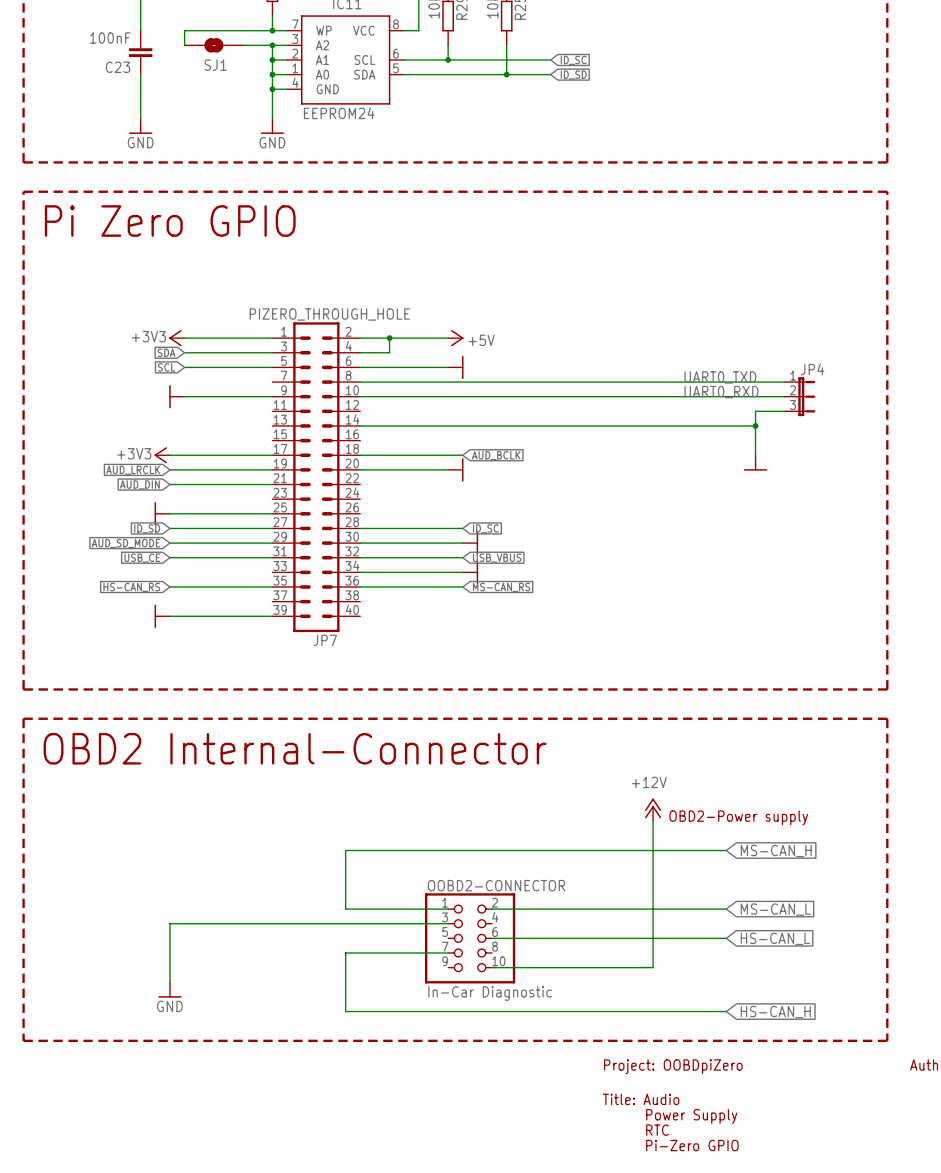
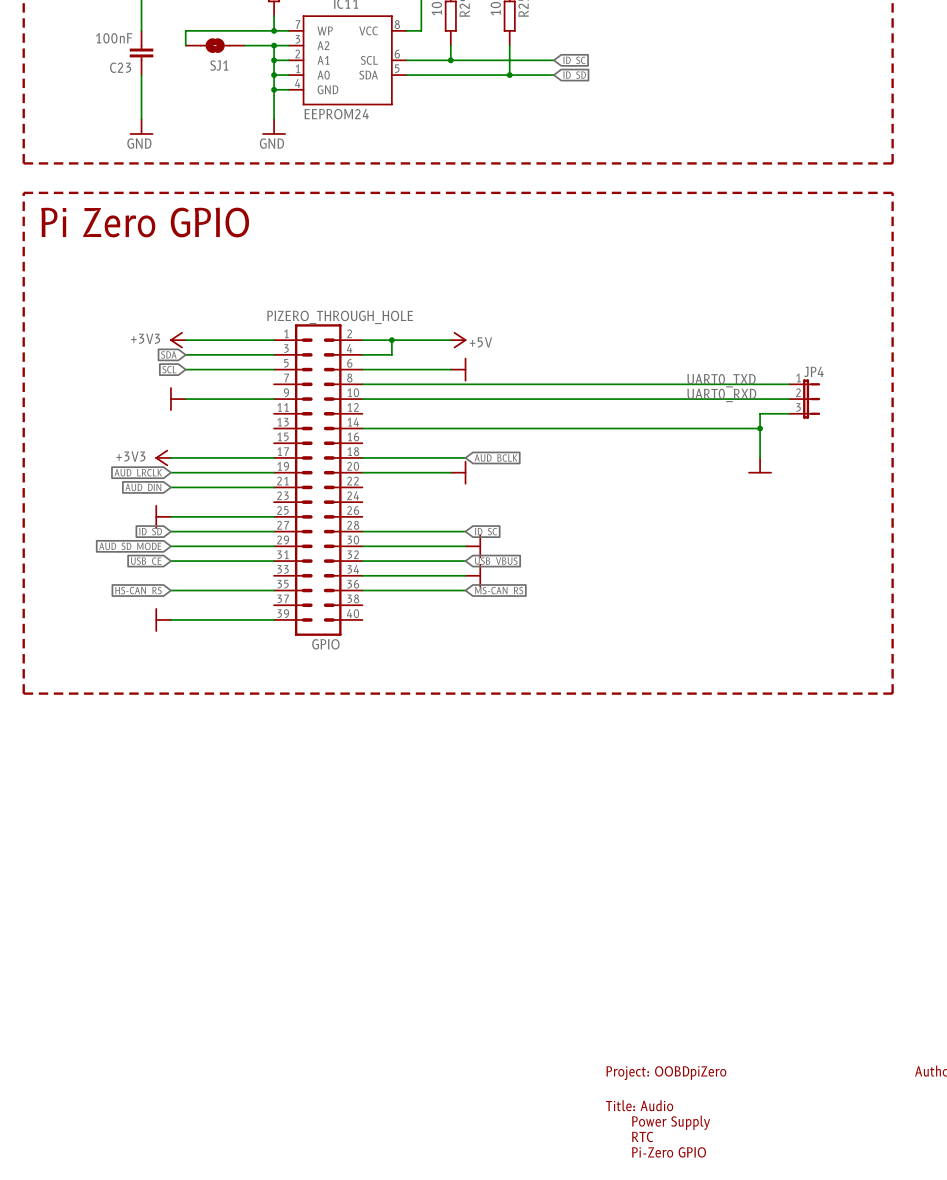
JP7 name: JP7 (325, 640) -> GPIO (325, 644)
line: (23, 718) (23, 1040) (887, 1040) (887, 718) (23, 718) -> none
text: OBD2 Internal-Connector (295, 748) -> none
power symbol: +12V (653, 809) -> none
text: OBD2-Power supply (738, 817) -> none
wire: (653, 821) (653, 967) (492, 967) -> none
wire: (726, 850) (345, 850) (345, 909) (448, 909) -> none
global label: MS-CAN_H (776, 851) -> none
wire: (492, 909) (726, 909) -> none
global label: MS-CAN_L (775, 909) -> none
wire: (448, 923) (169, 923) (169, 982) -> none
OOBD2-CONNECTOR: In-Car Diagnostic (470, 938) -> none
wire: (492, 938) (726, 938) -> none
global label: HS-CAN_L (775, 938) -> none
wire: (448, 953) (345, 953) (345, 1011) (726, 1011) -> none
power symbol: GND (169, 989) -> none
global label: HS-CAN_H (775, 1012) -> none

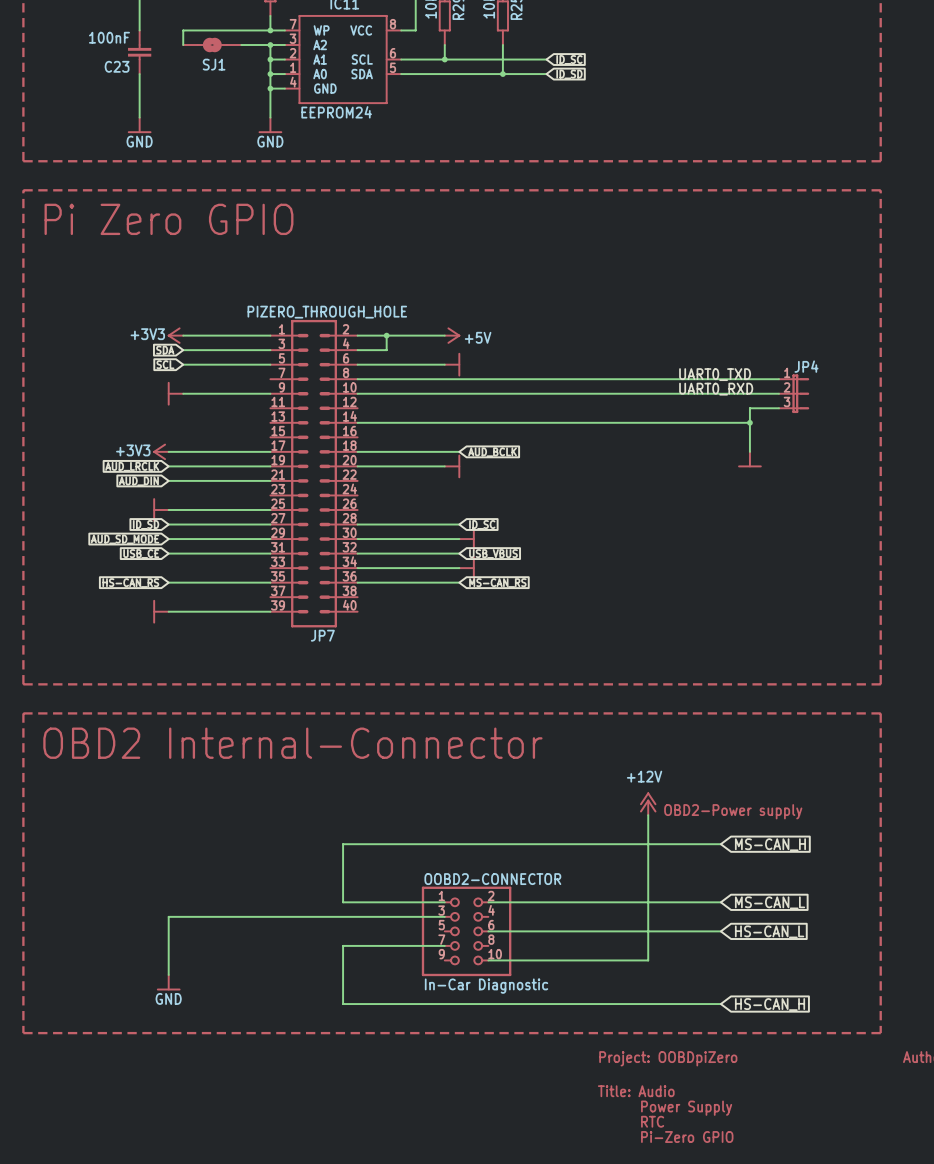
GPIO name: GPIO (325, 644) -> JP7 (322, 635)
line: none -> (23, 713) (23, 1033) (880, 1033) (880, 713) (23, 713)
text: none -> OBD2 Internal-Connector (292, 743)
power symbol: none -> +12V (648, 803)
text: none -> OBD2-Power supply (733, 811)
wire: none -> (648, 815) (648, 960) (488, 960)
wire: none -> (720, 844) (343, 844) (343, 902) (444, 902)
global label: none -> MS-CAN_H (770, 844)
wire: none -> (488, 902) (720, 902)
global label: none -> MS-CAN_L (770, 902)
wire: none -> (444, 916) (168, 916) (168, 974)
OOBD2-CONNECTOR: none -> In-Car Diagnostic (466, 931)
wire: none -> (488, 931) (720, 931)
global label: none -> HS-CAN_L (769, 931)
wire: none -> (444, 945) (343, 945) (343, 1004) (720, 1004)
power symbol: none -> GND (168, 982)
global label: none -> HS-CAN_H (770, 1004)

